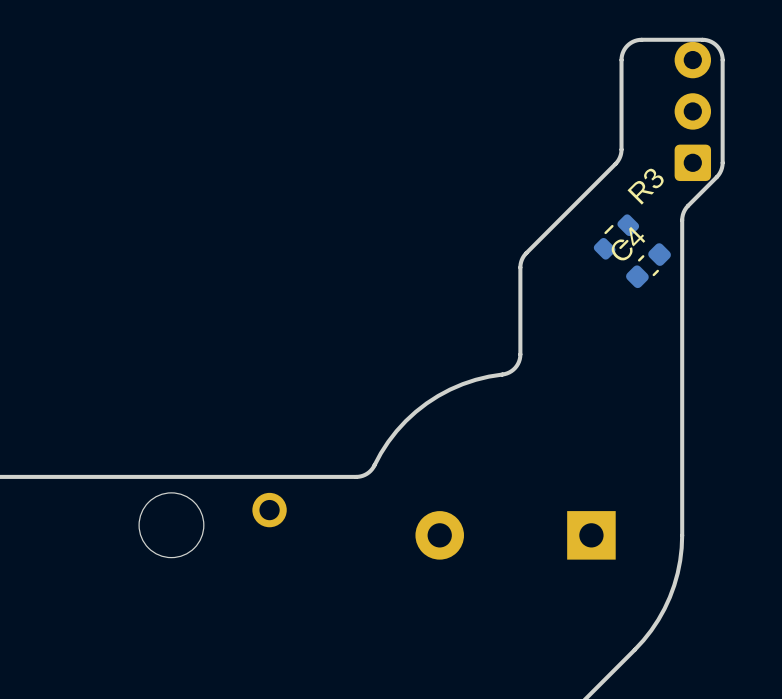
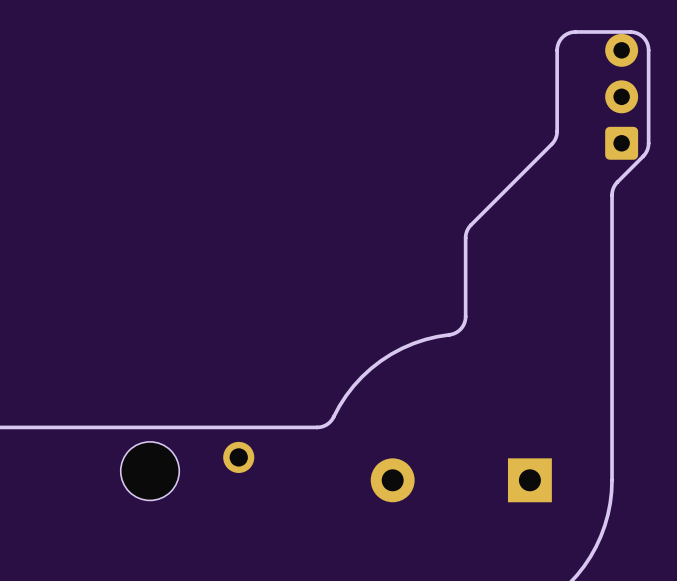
R3: (616, 236) -> none
C4: (648, 265) -> none

